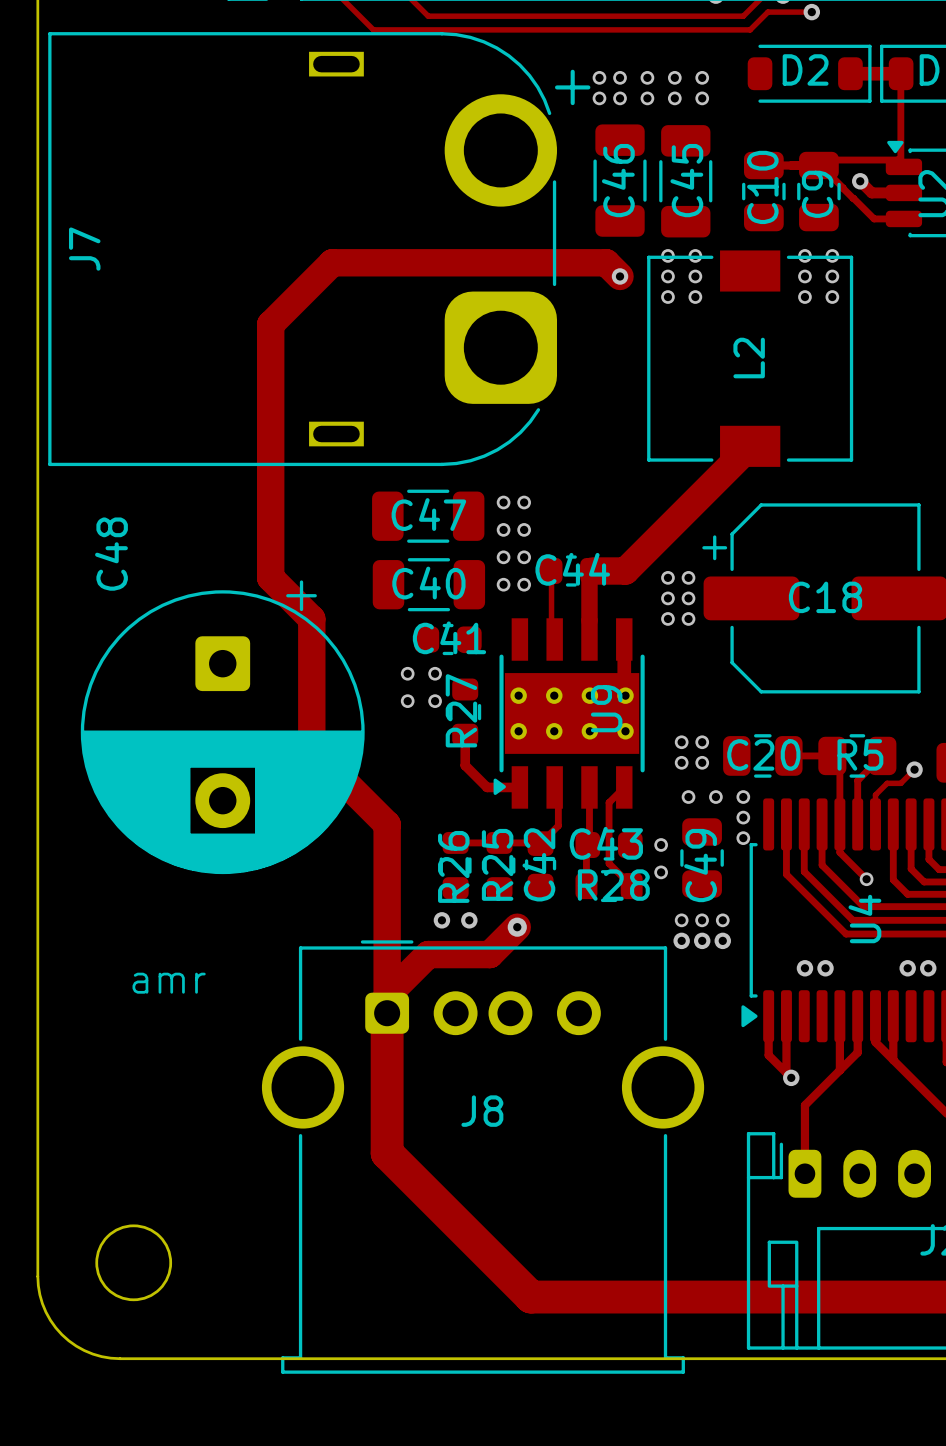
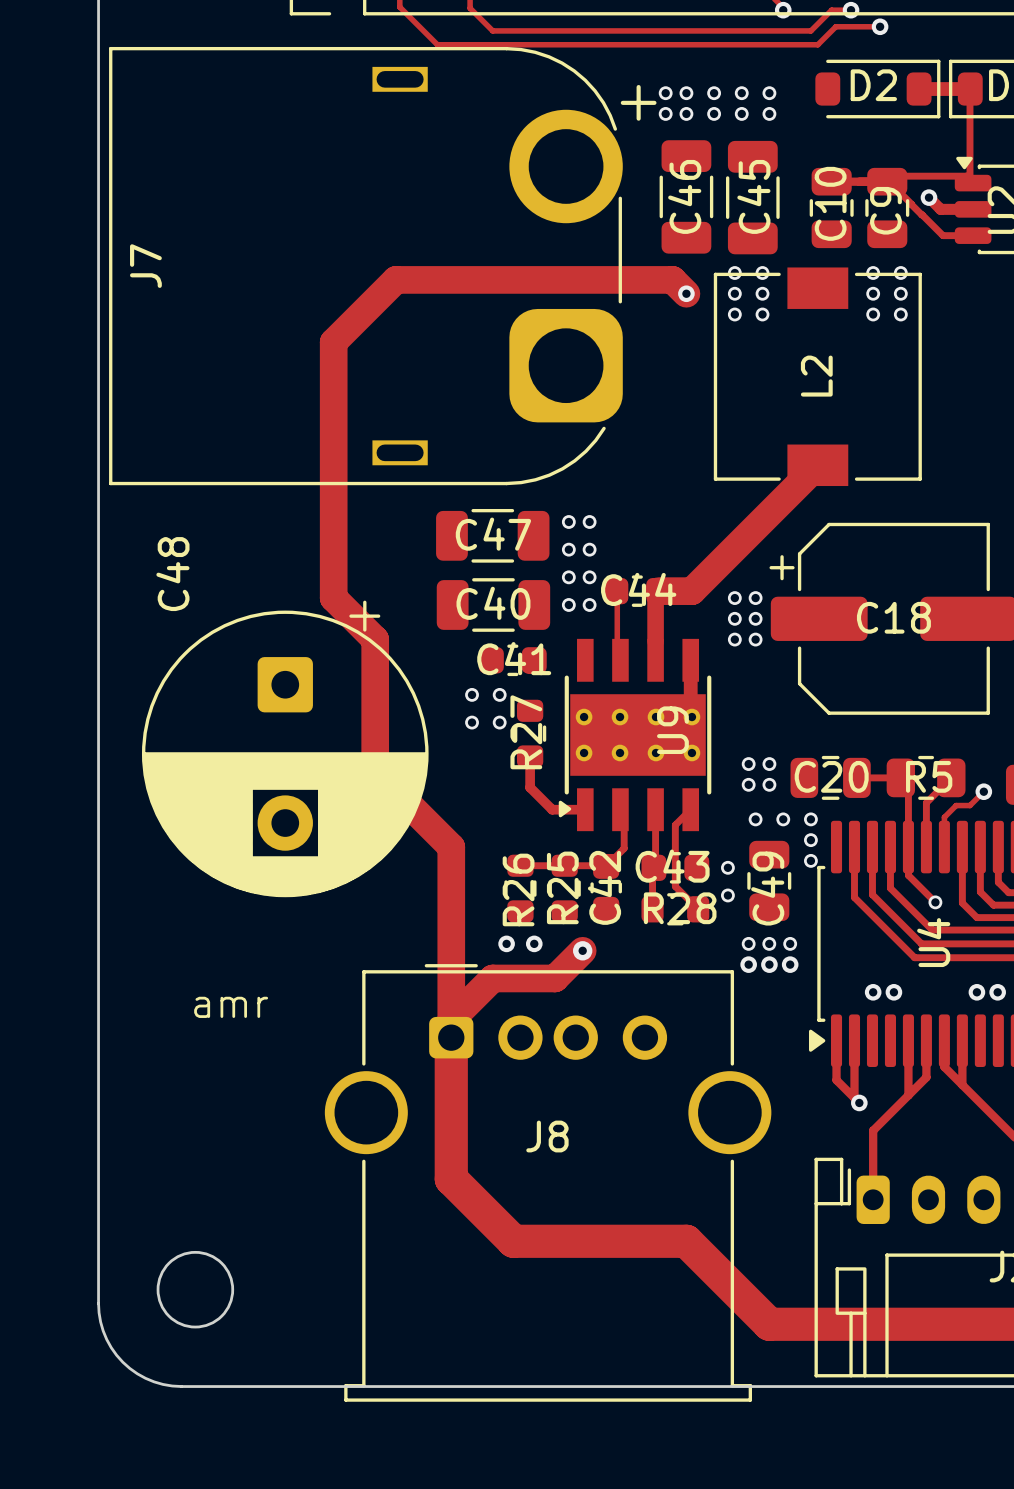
track: (448, 1214) (530, 1297) (702, 1297) -> (513, 1241) (686, 1241) (769, 1324)

